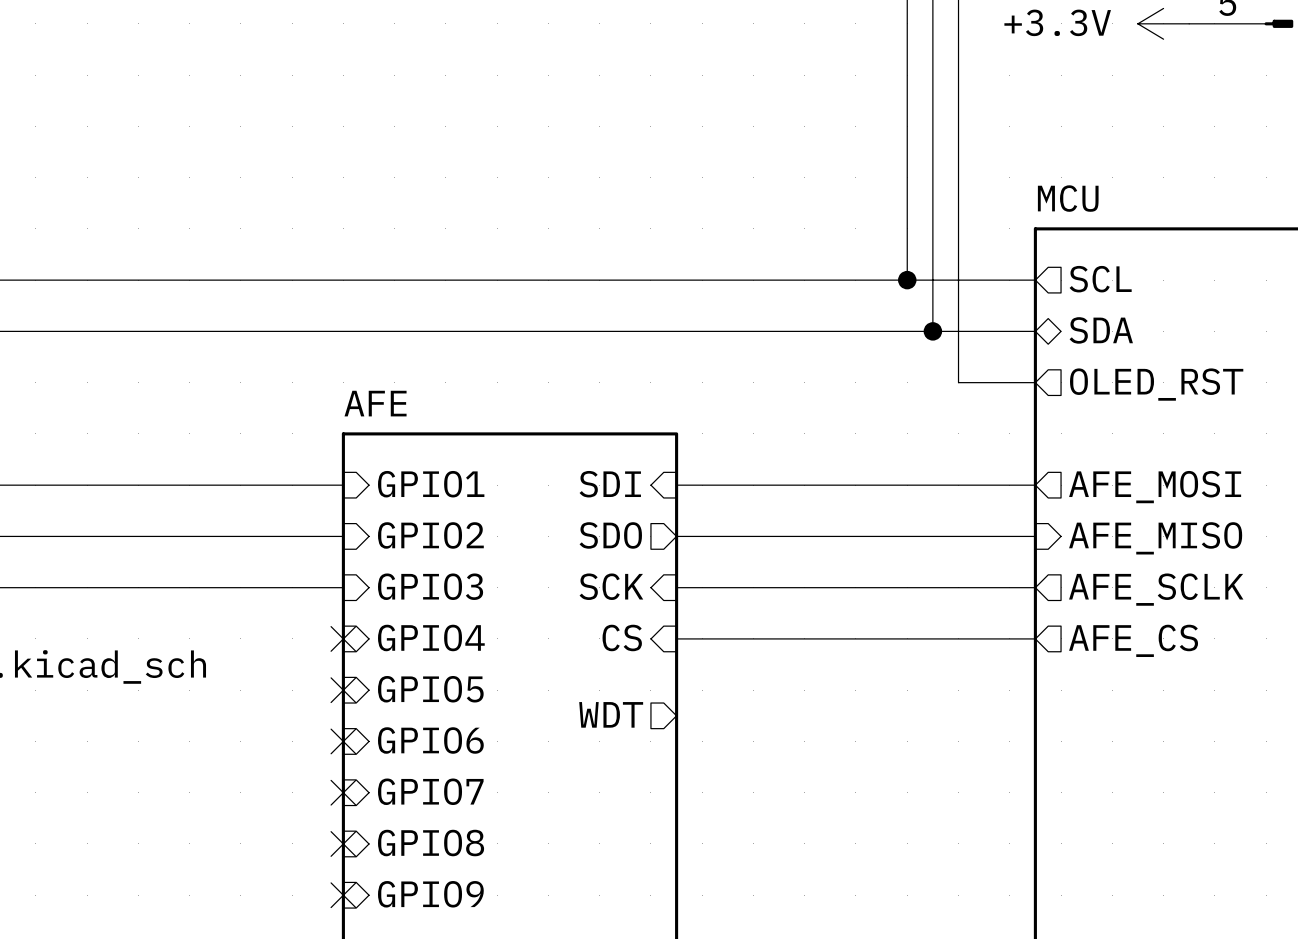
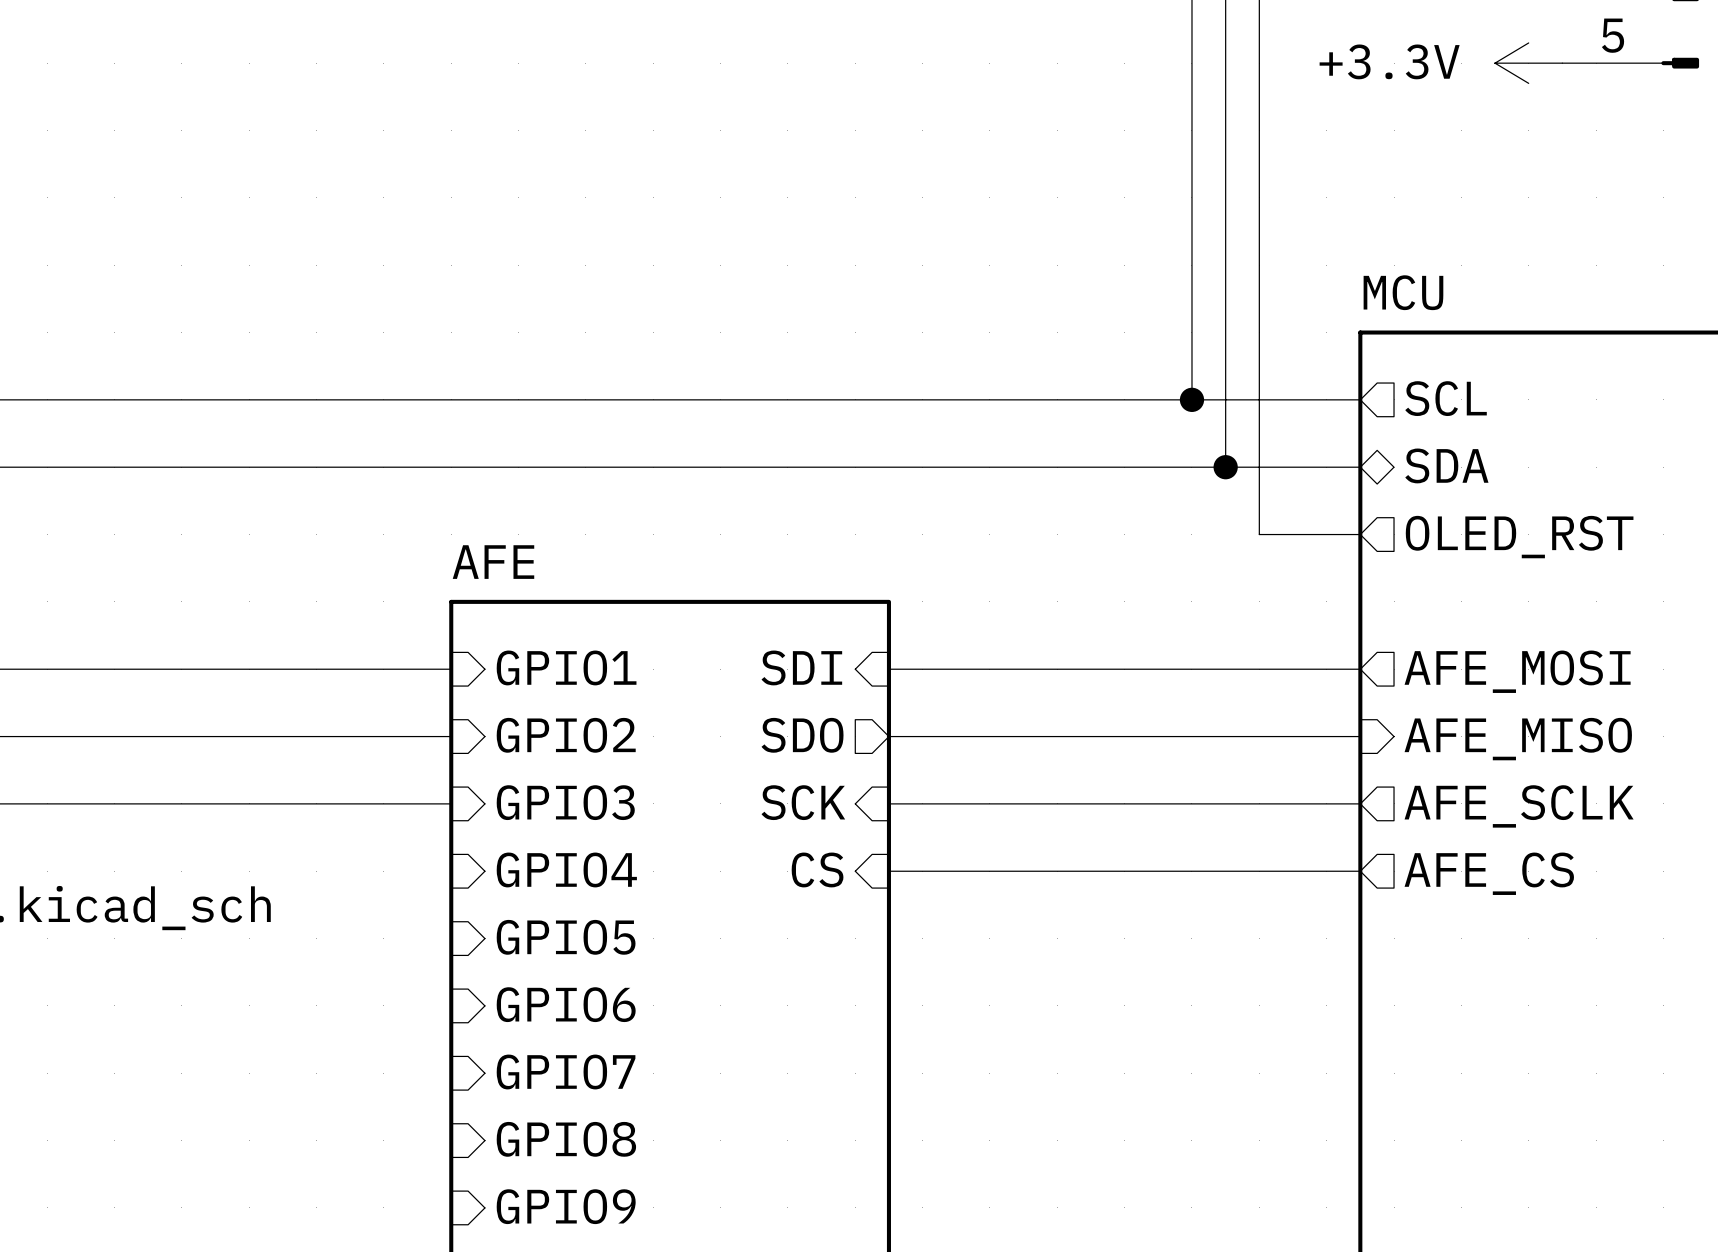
no-connect mark: (343, 638) -> none
no-connect mark: (343, 690) -> none
sheet pin: WDT (611, 714) -> none
no-connect mark: (343, 741) -> none
no-connect mark: (343, 792) -> none
no-connect mark: (343, 843) -> none
no-connect mark: (343, 895) -> none

